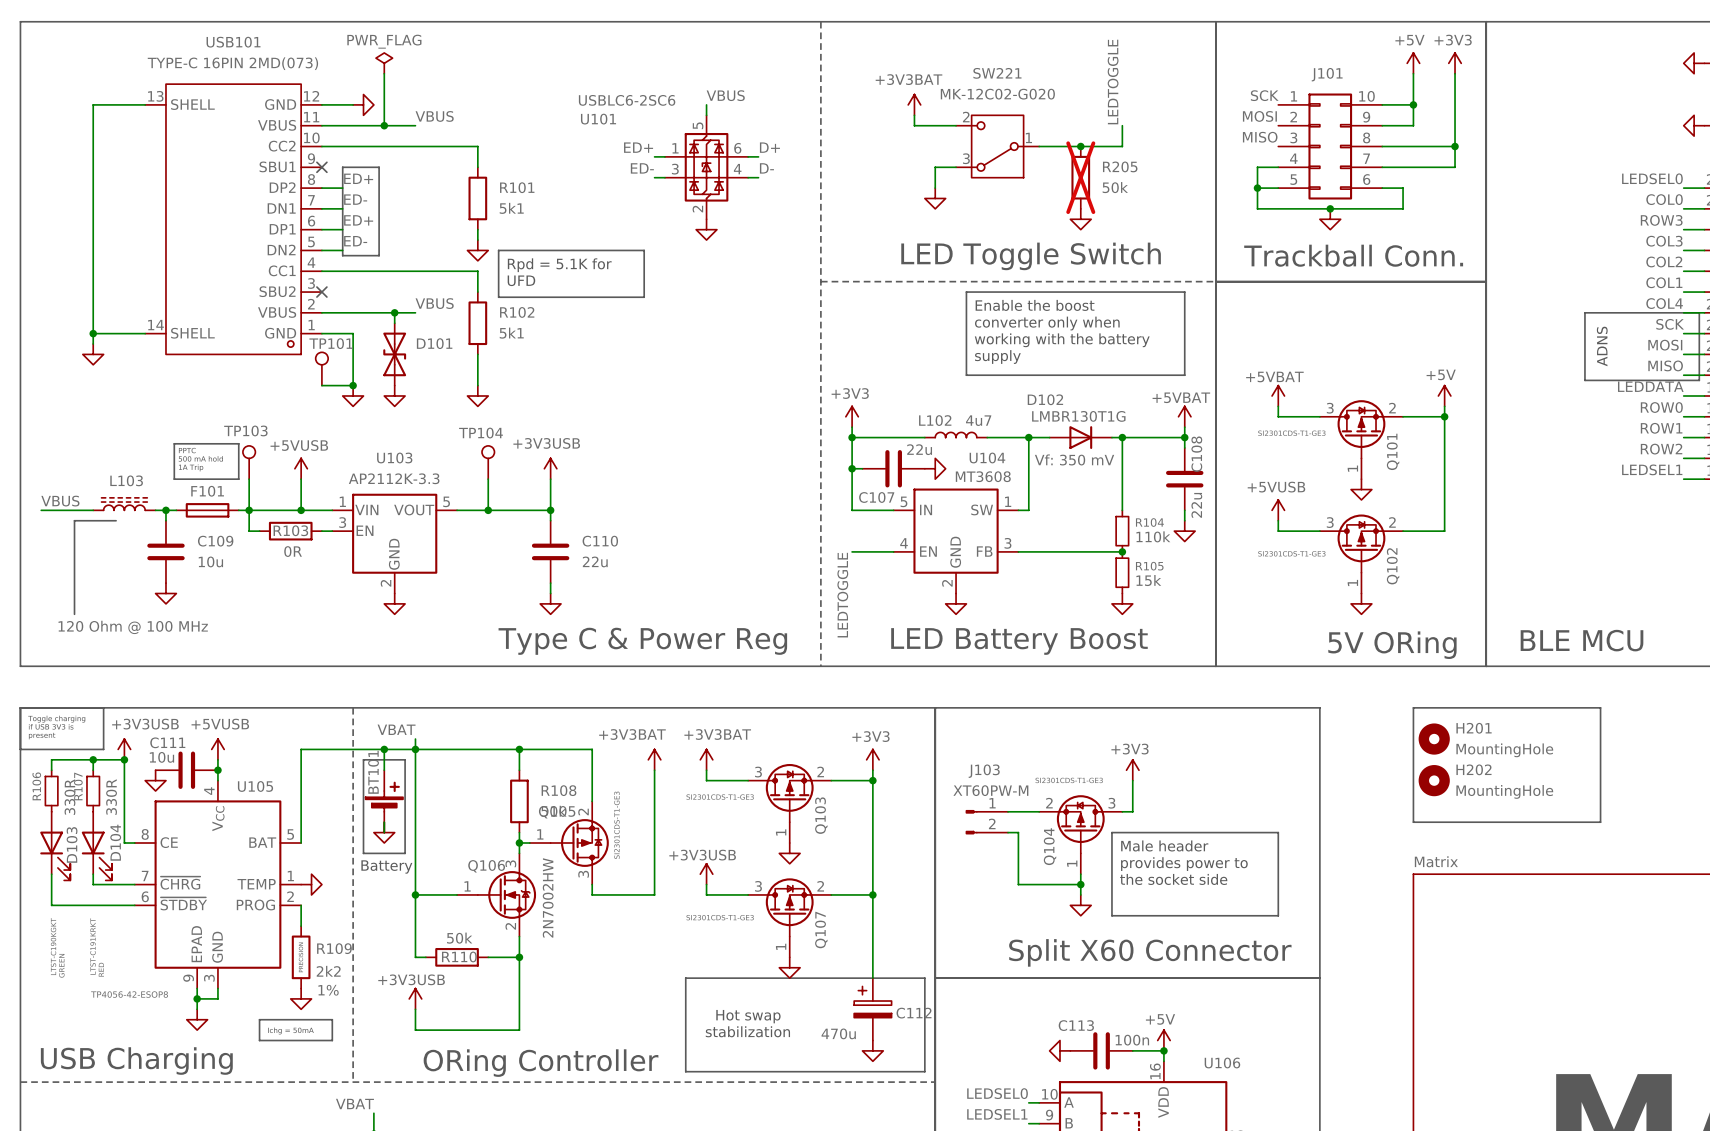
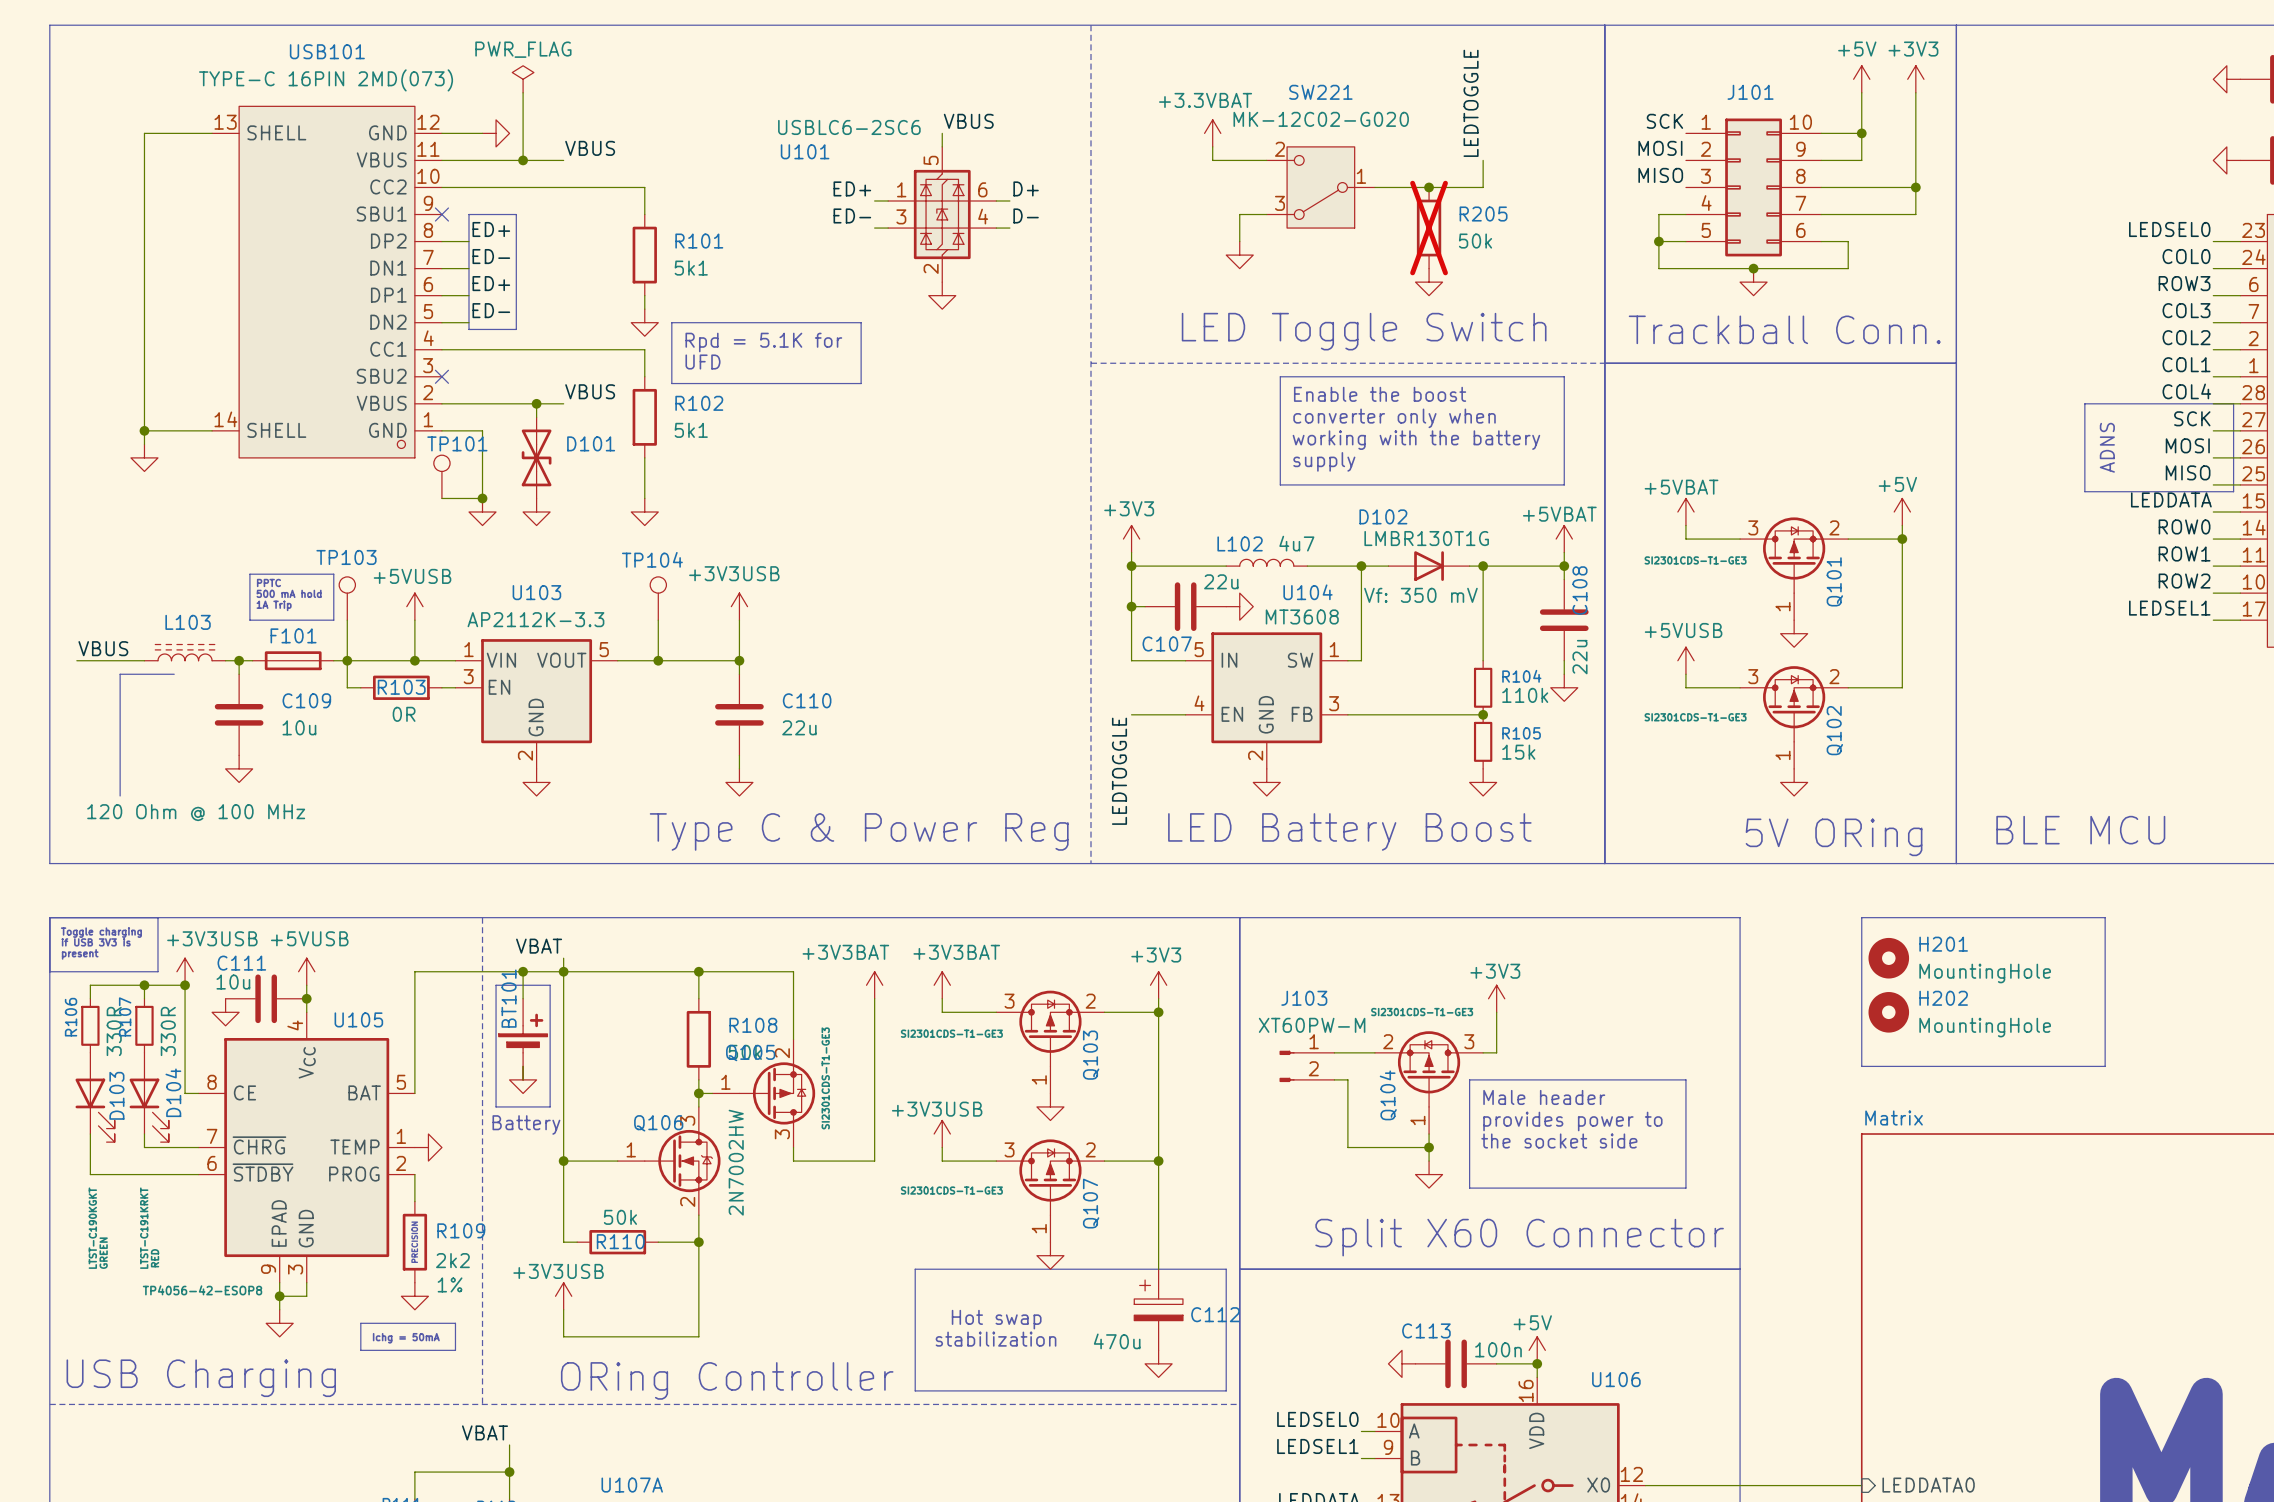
power symbol: +3V3BAT (914, 104) -> +3.3VBAT (1212, 133)

